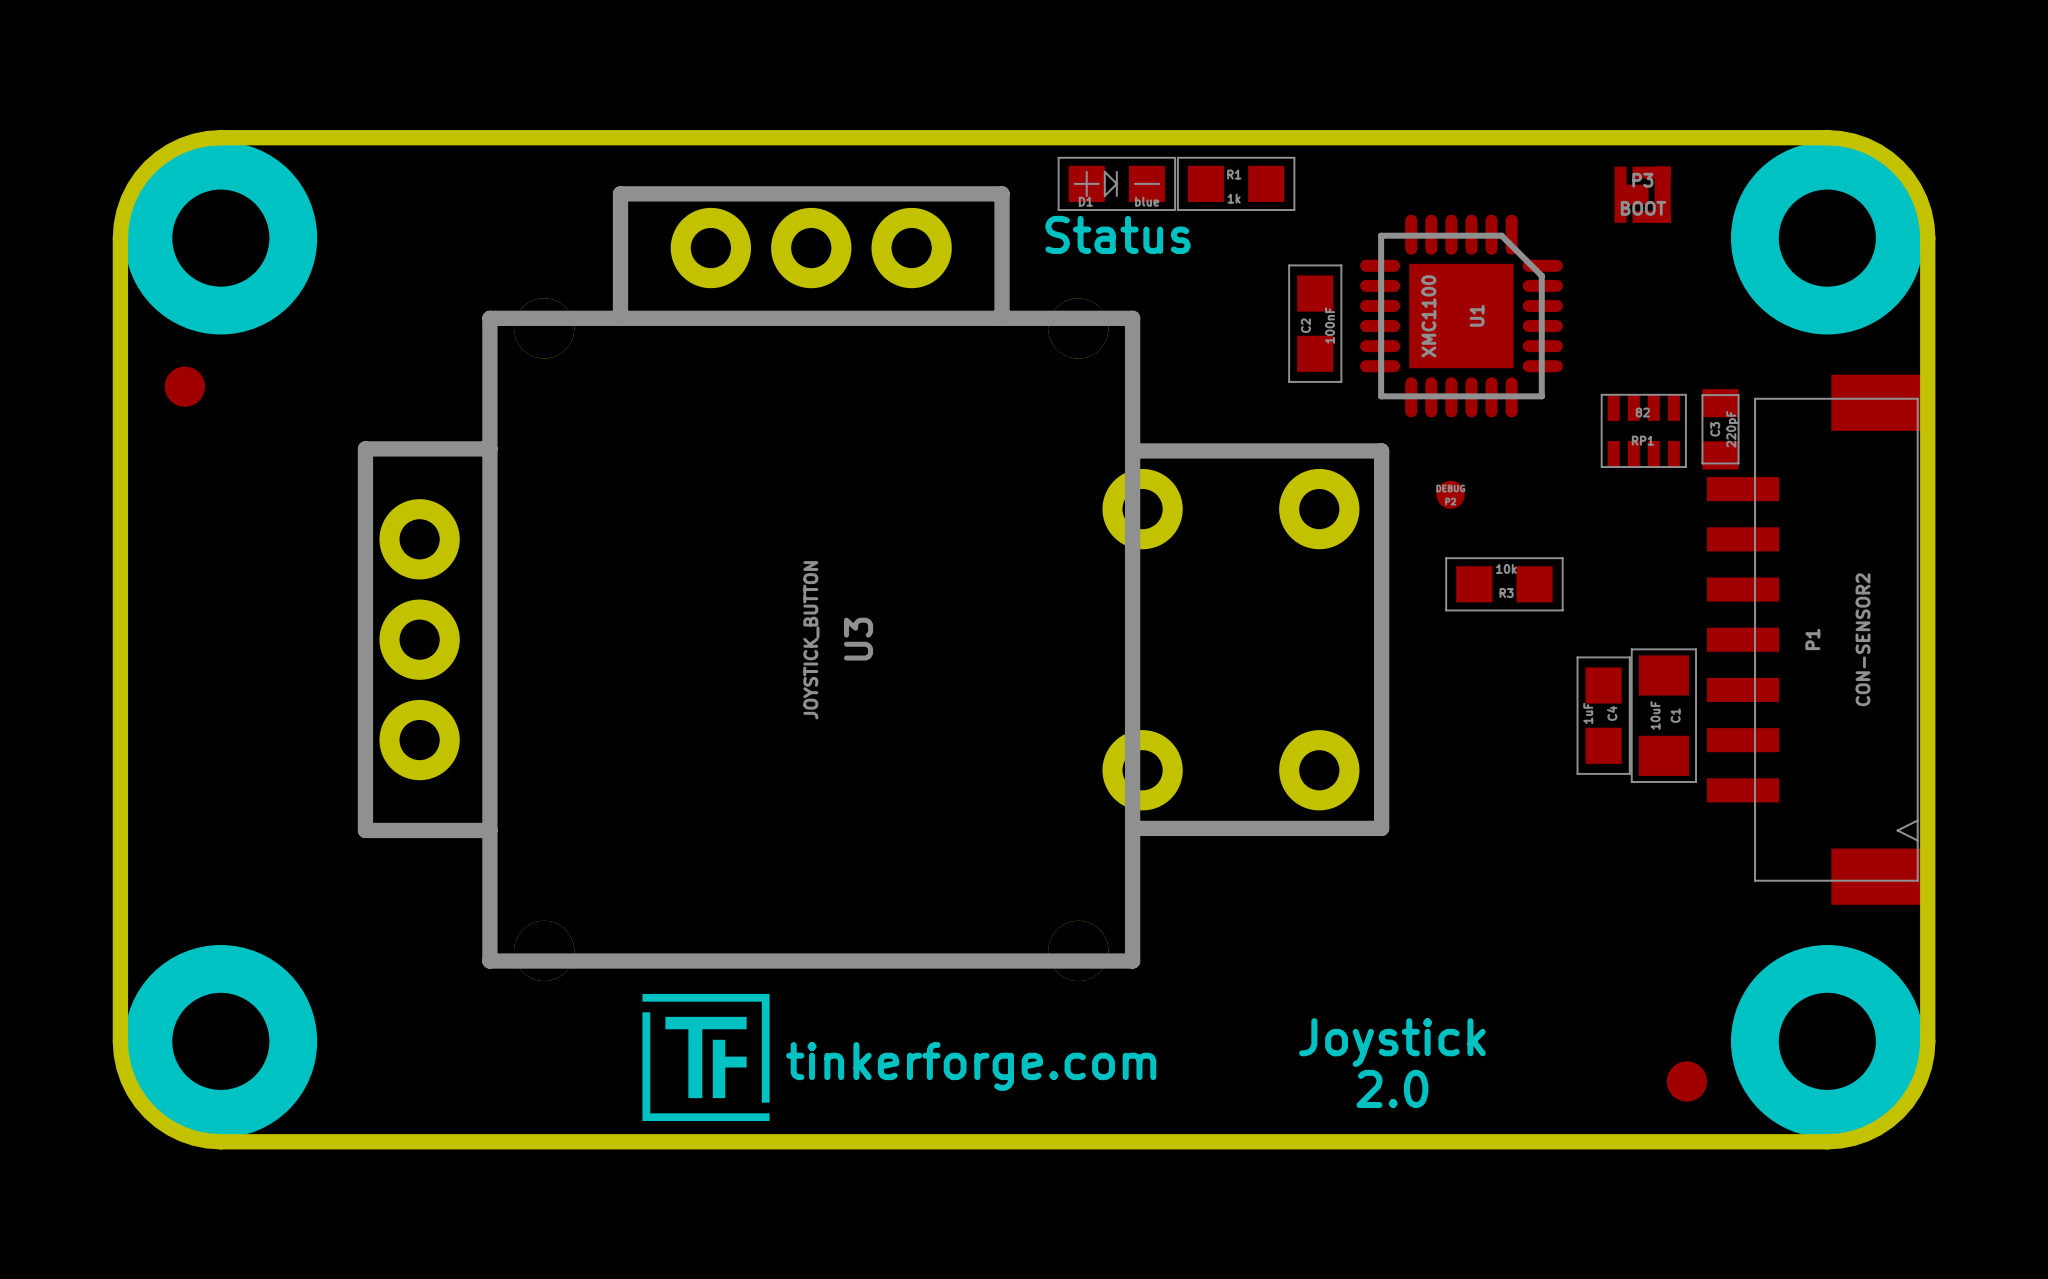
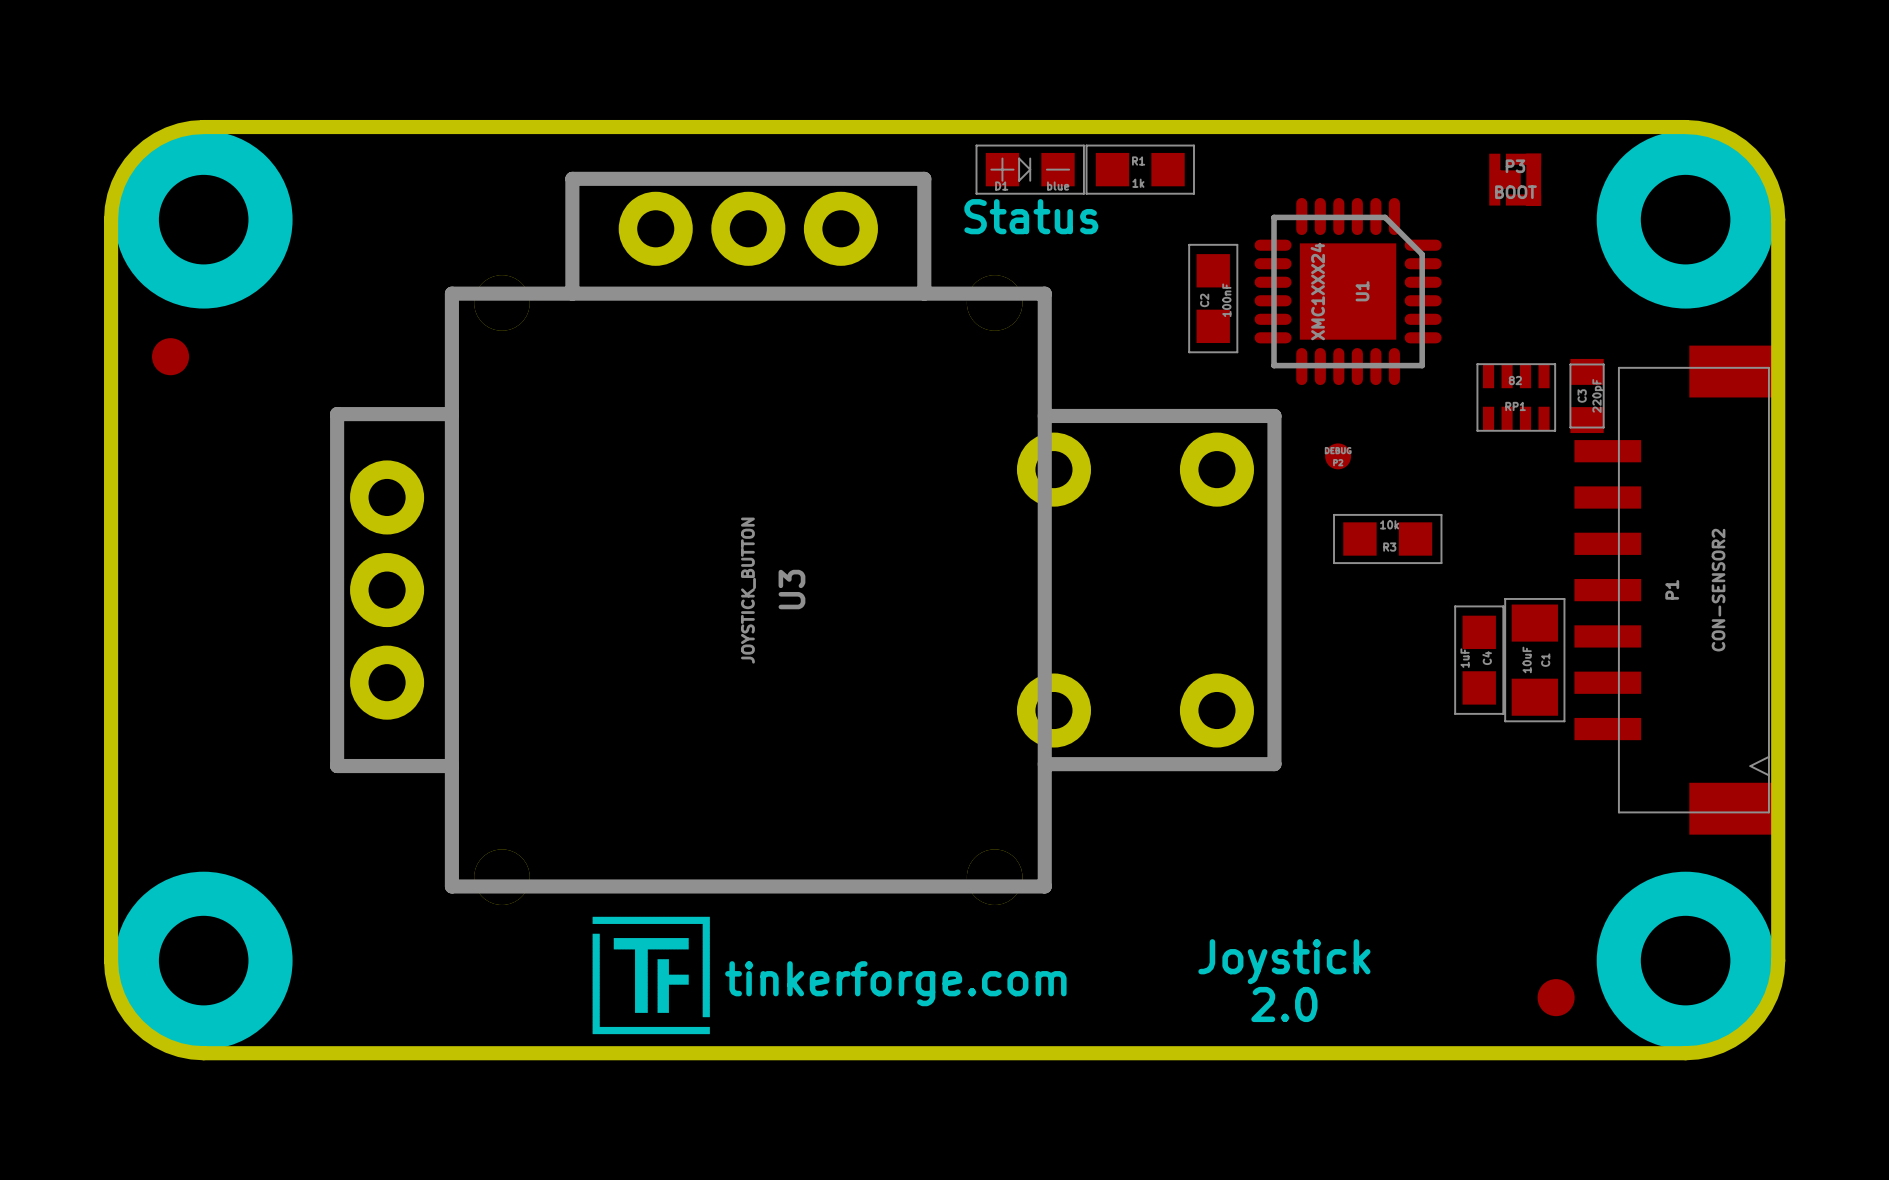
U1 value: XMC1100 (1428, 316) -> XMC1XXX24 (1317, 291)

